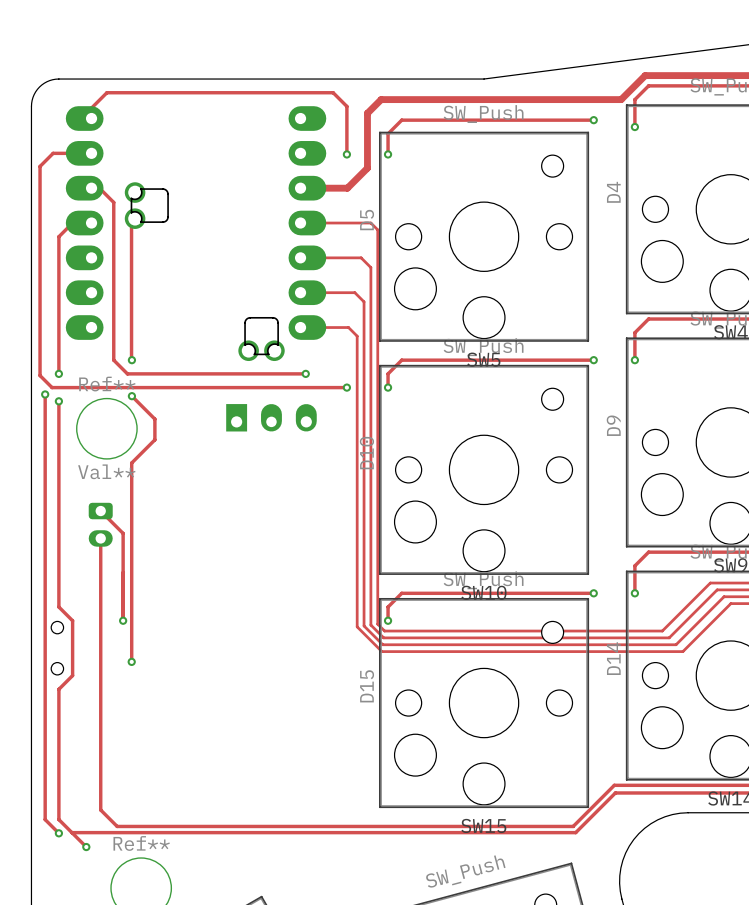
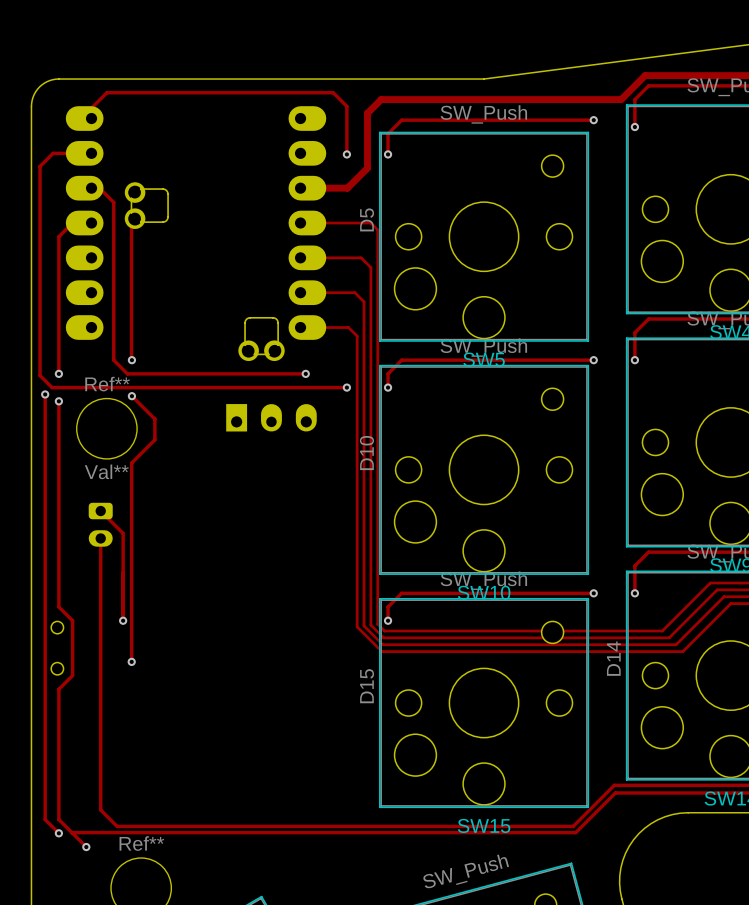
D4: (613, 192) -> none
D9: (613, 425) -> none

